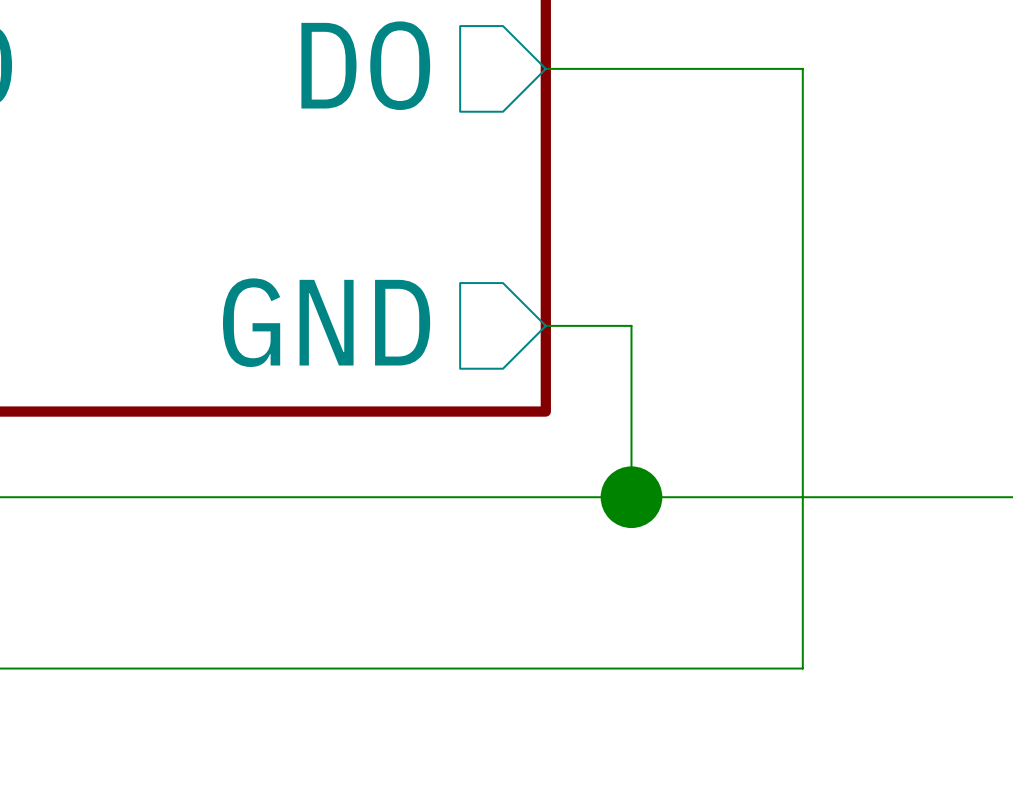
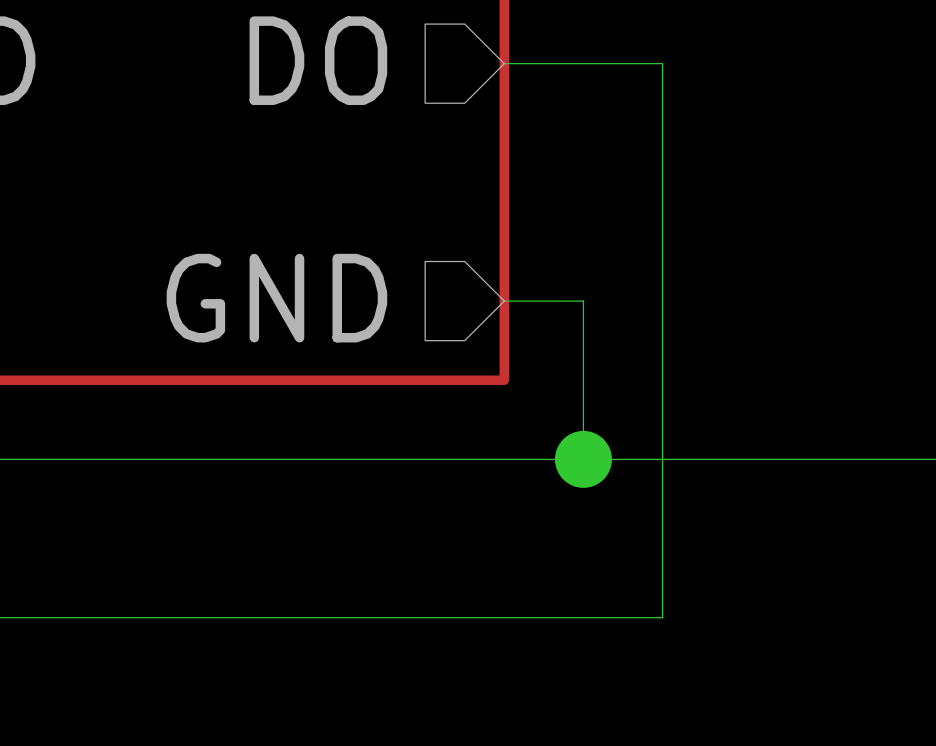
wire: (717, 68) (802, 68) (802, 668) (717, 668) -> (662, 63) (662, 617)

